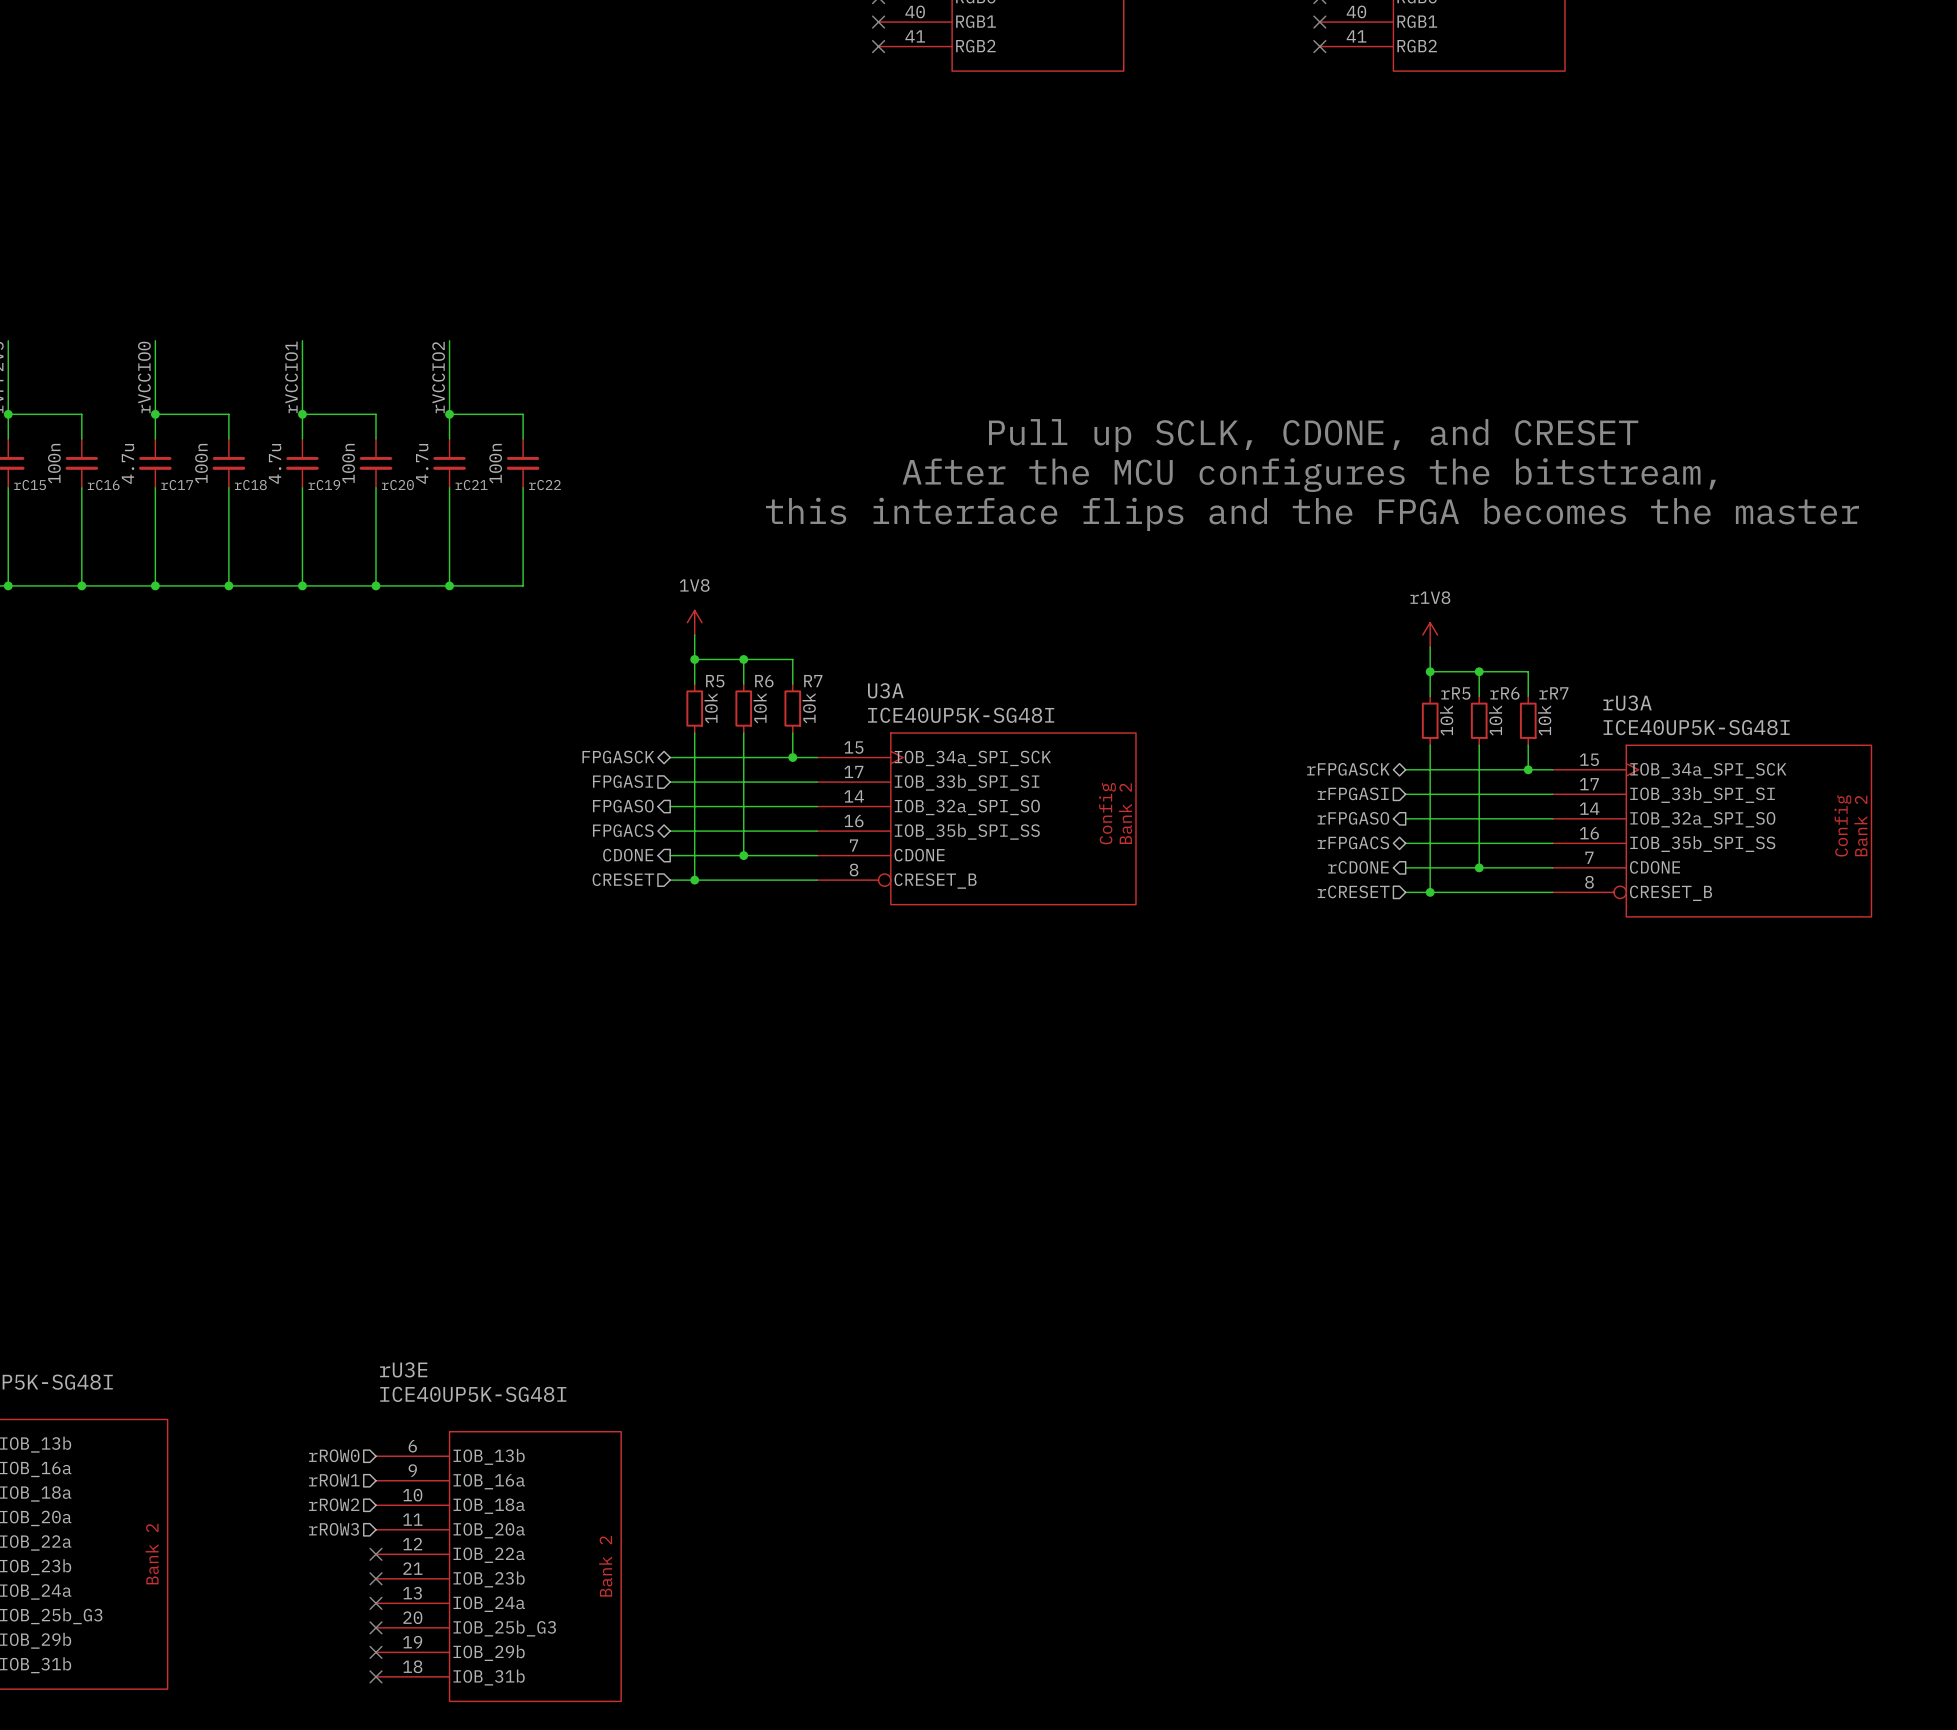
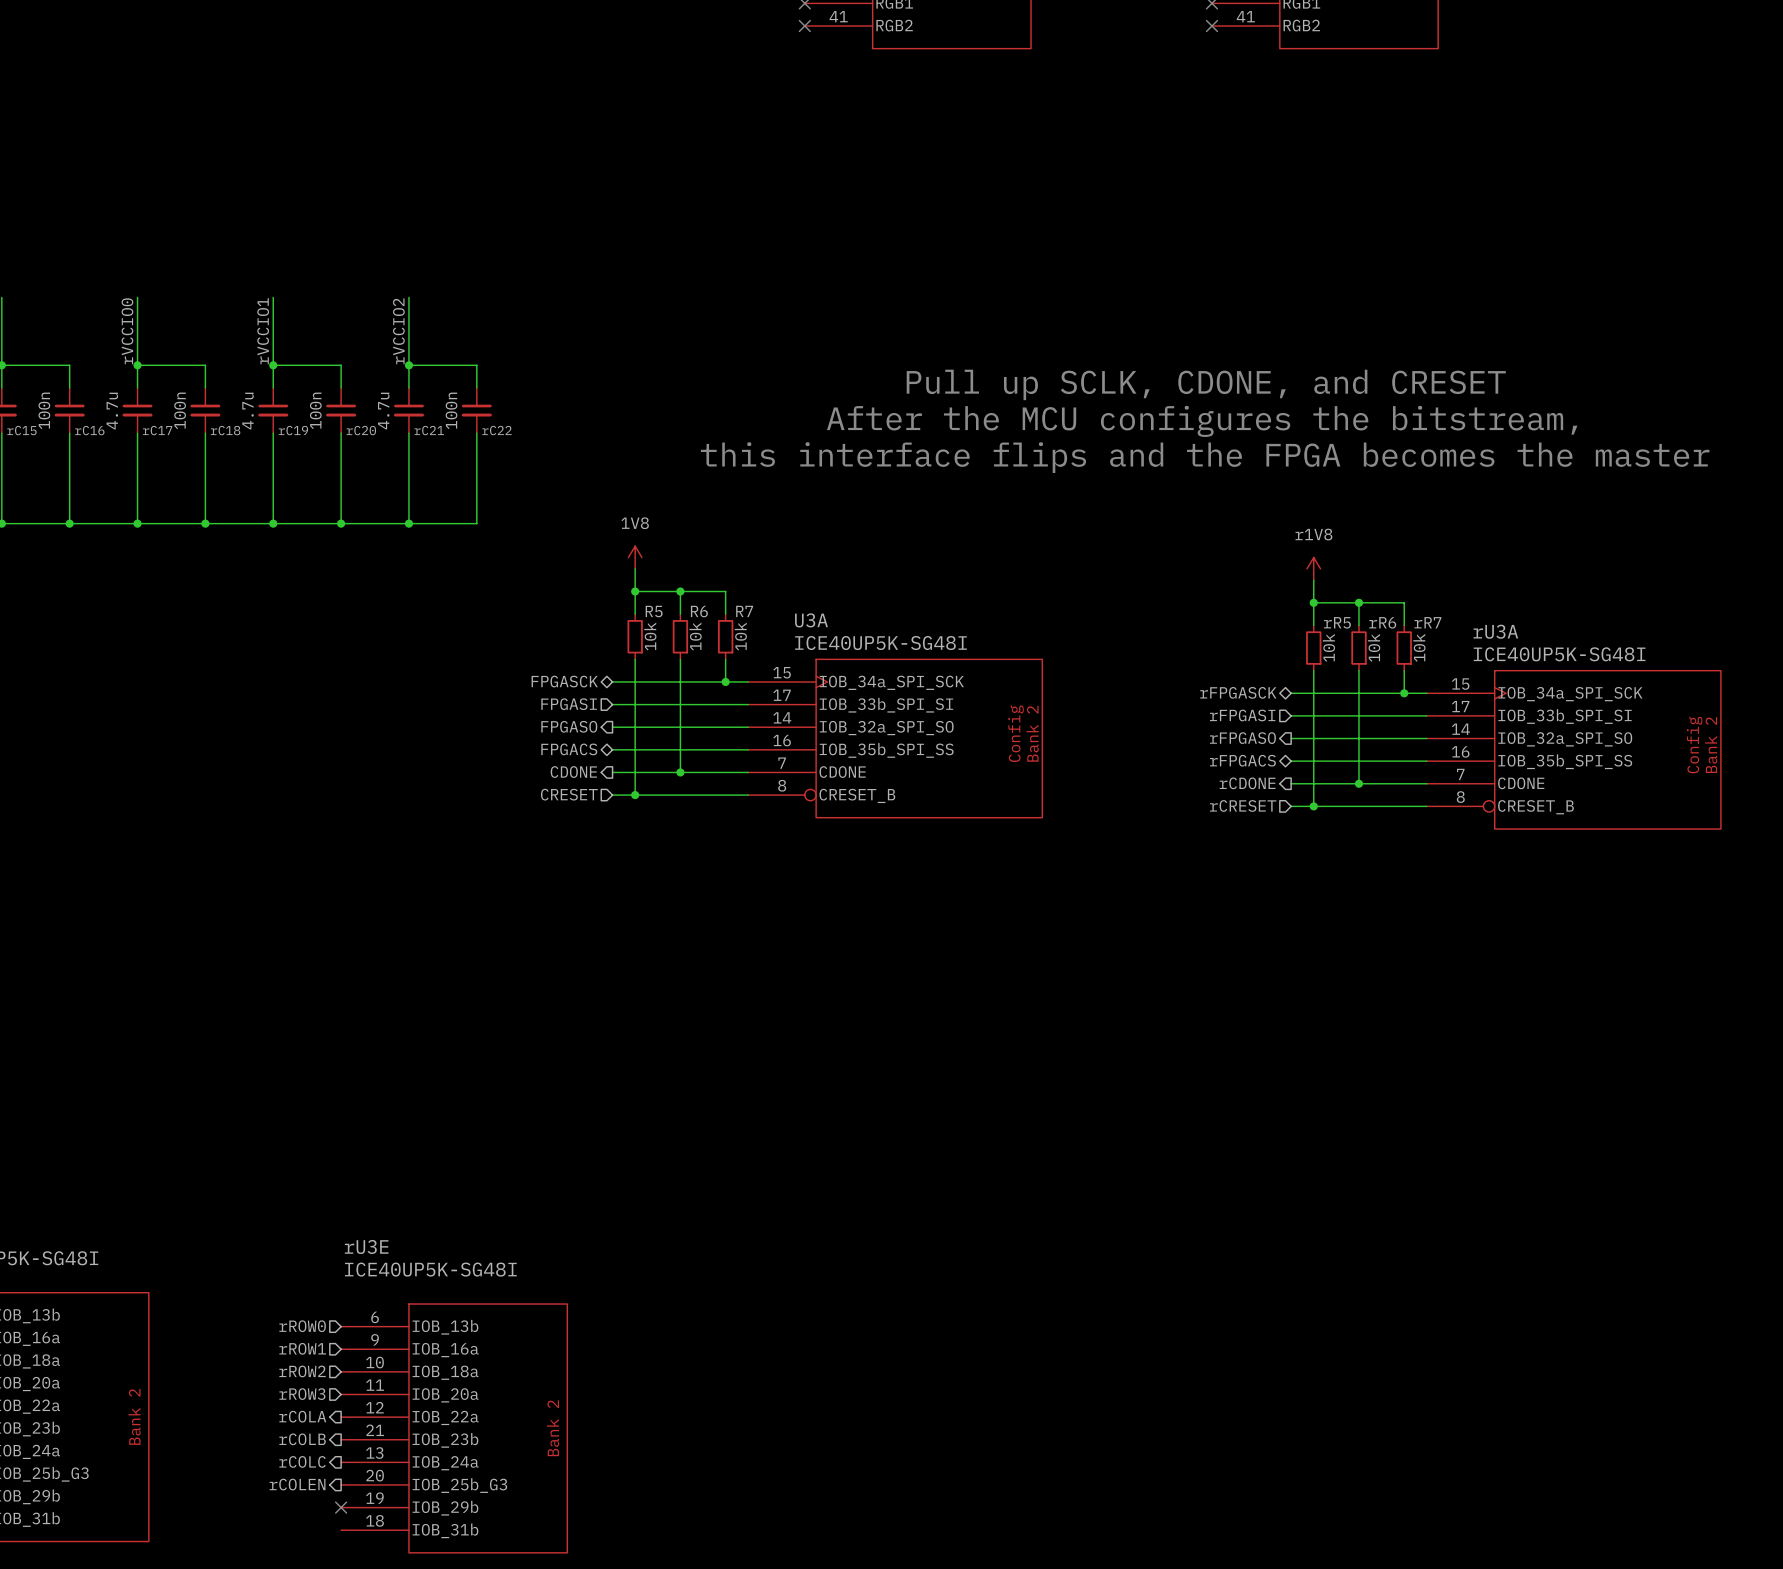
hierarchical label: none -> rCOLA (302, 1416)
no-connect mark: (376, 1554) -> none
hierarchical label: none -> rCOLB (302, 1439)
no-connect mark: (376, 1578) -> none
hierarchical label: none -> rCOLC (302, 1461)
no-connect mark: (376, 1603) -> none
hierarchical label: none -> rCOLEN (297, 1484)
no-connect mark: (376, 1627) -> none
no-connect mark: (376, 1676) -> none

